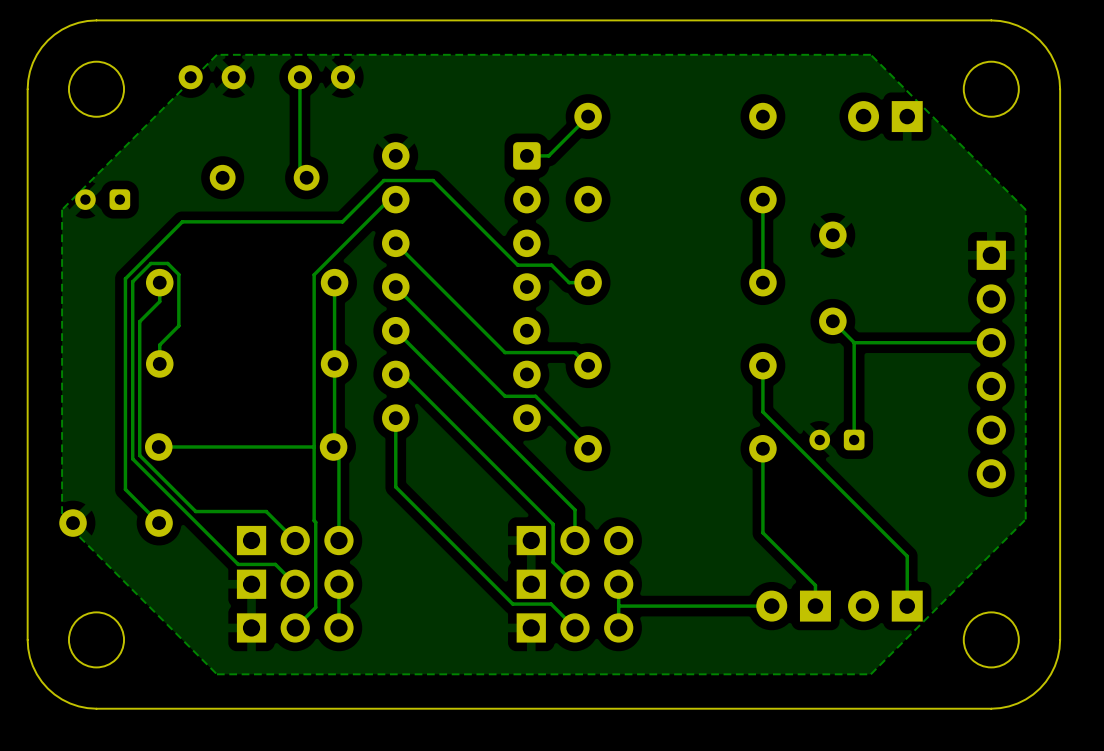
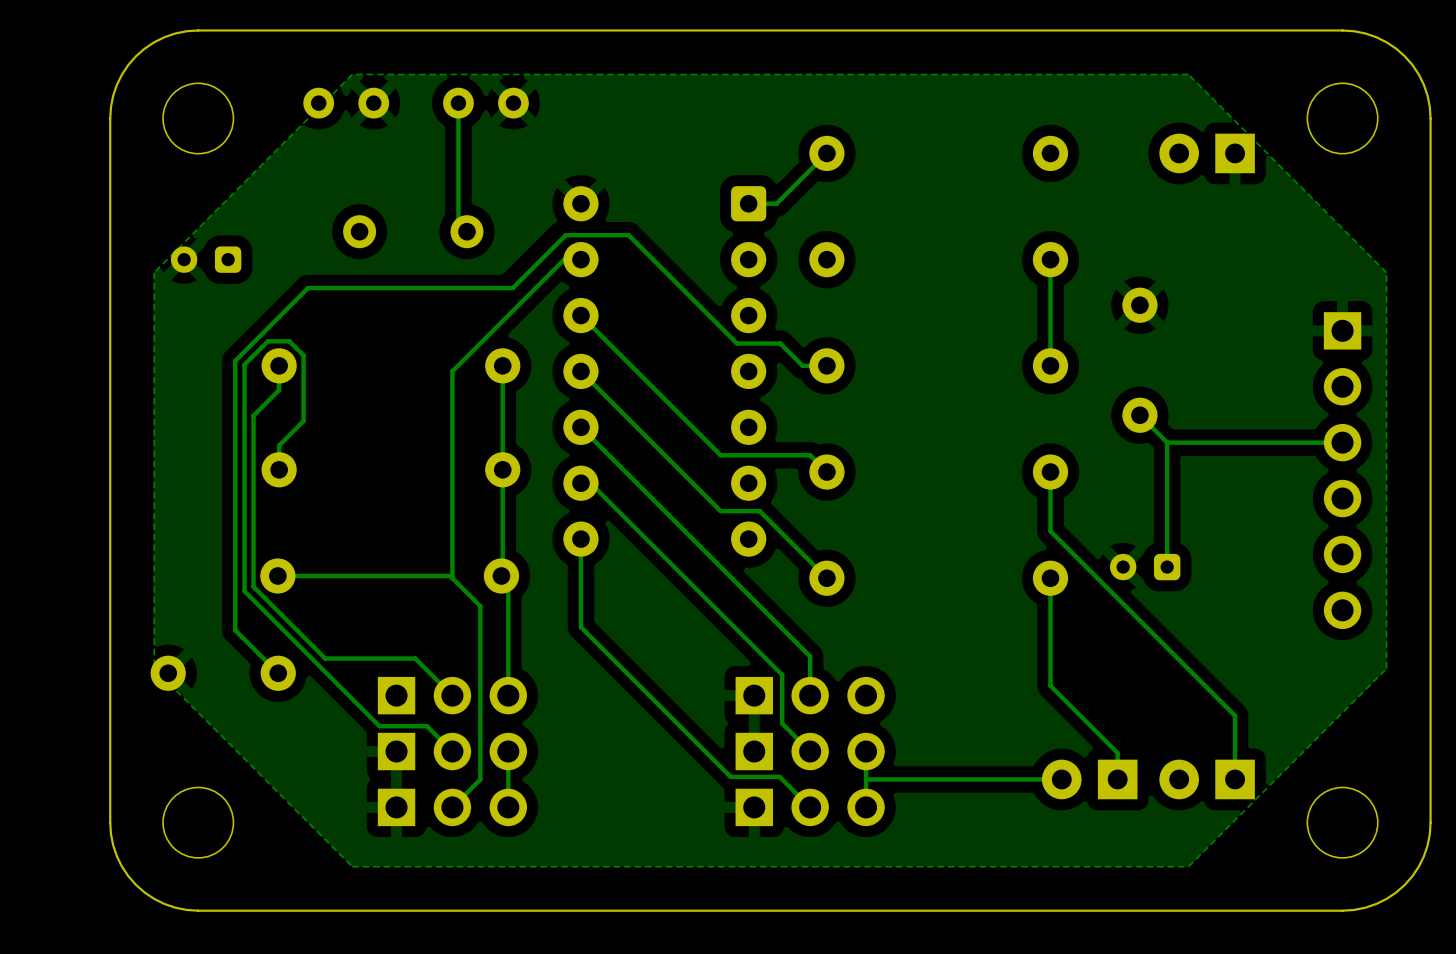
track: (389, 199) (314, 274) (315, 607) -> (572, 259) (564, 259) (452, 371) (452, 578)
track: (314, 446) (293, 446) -> (478, 781) (480, 779) (480, 606) (450, 576)

